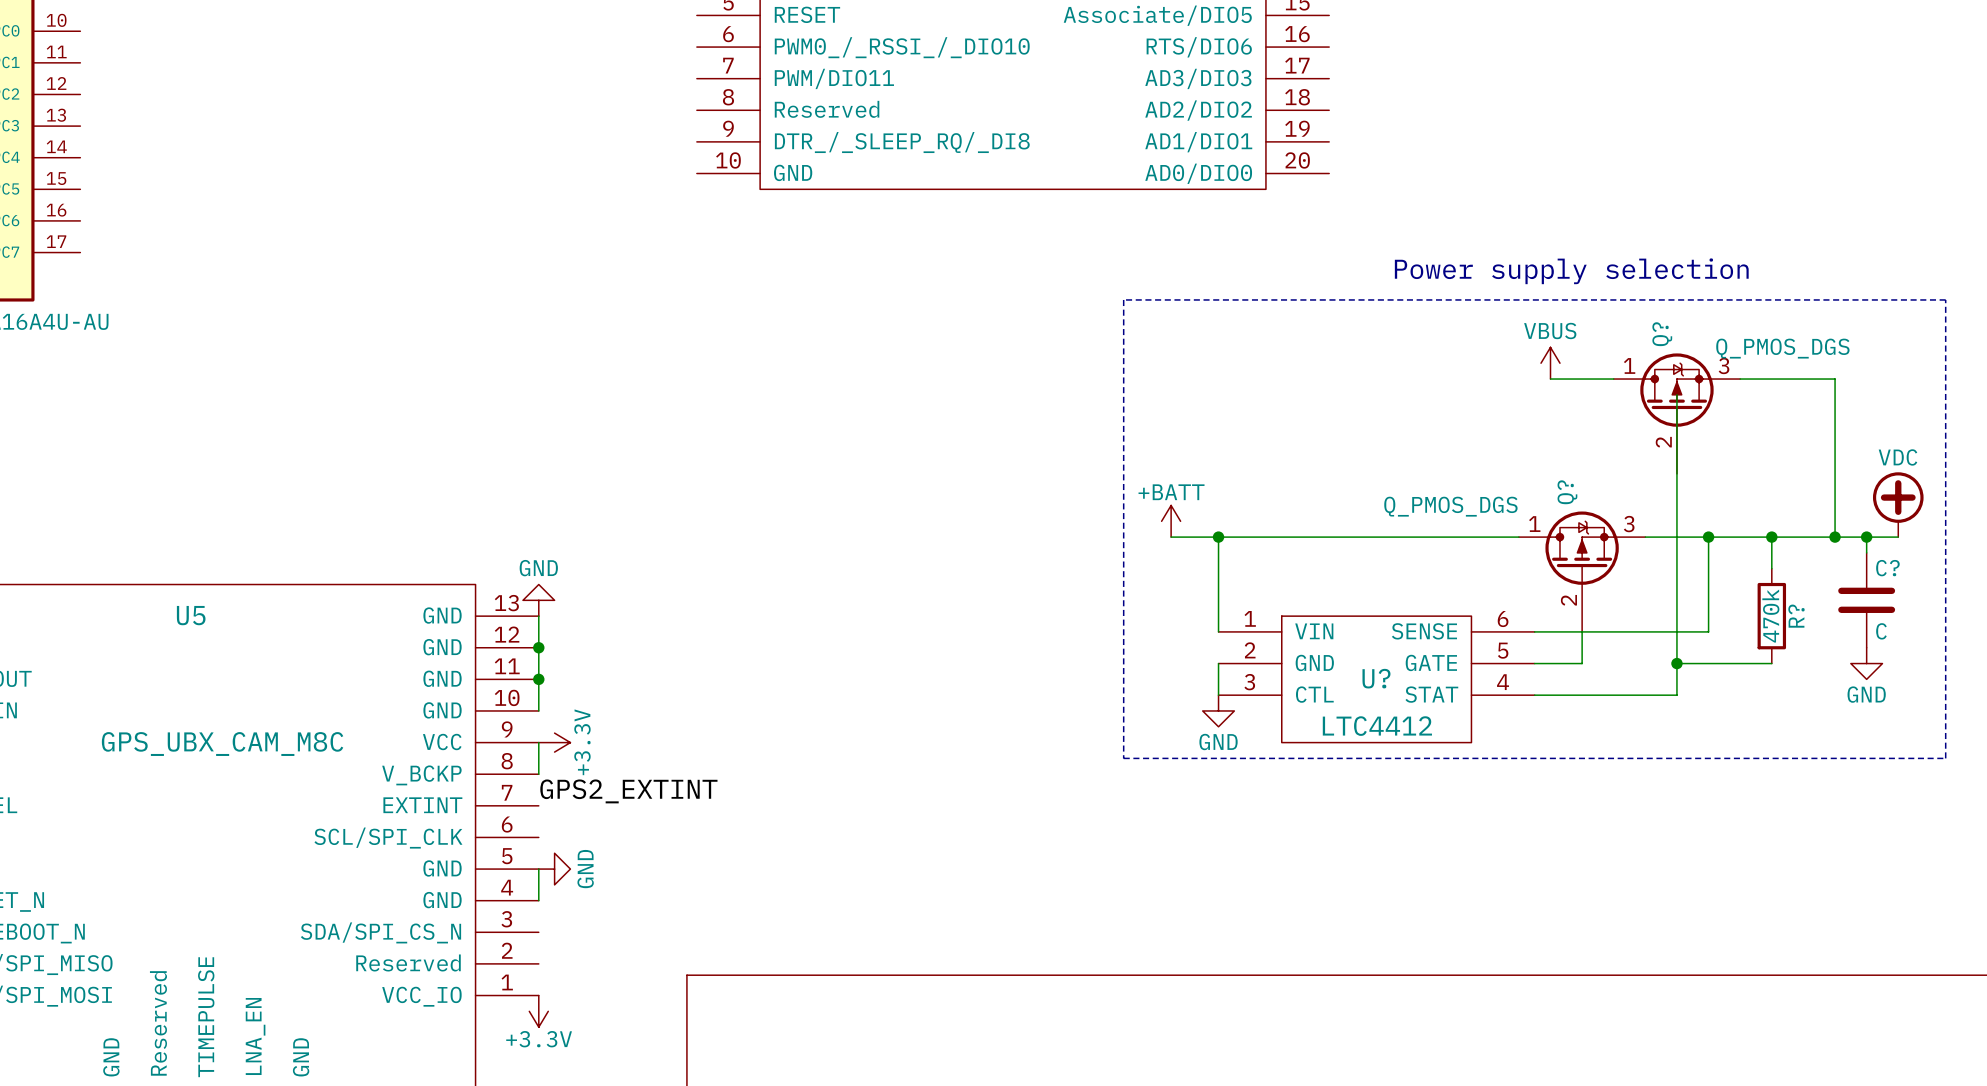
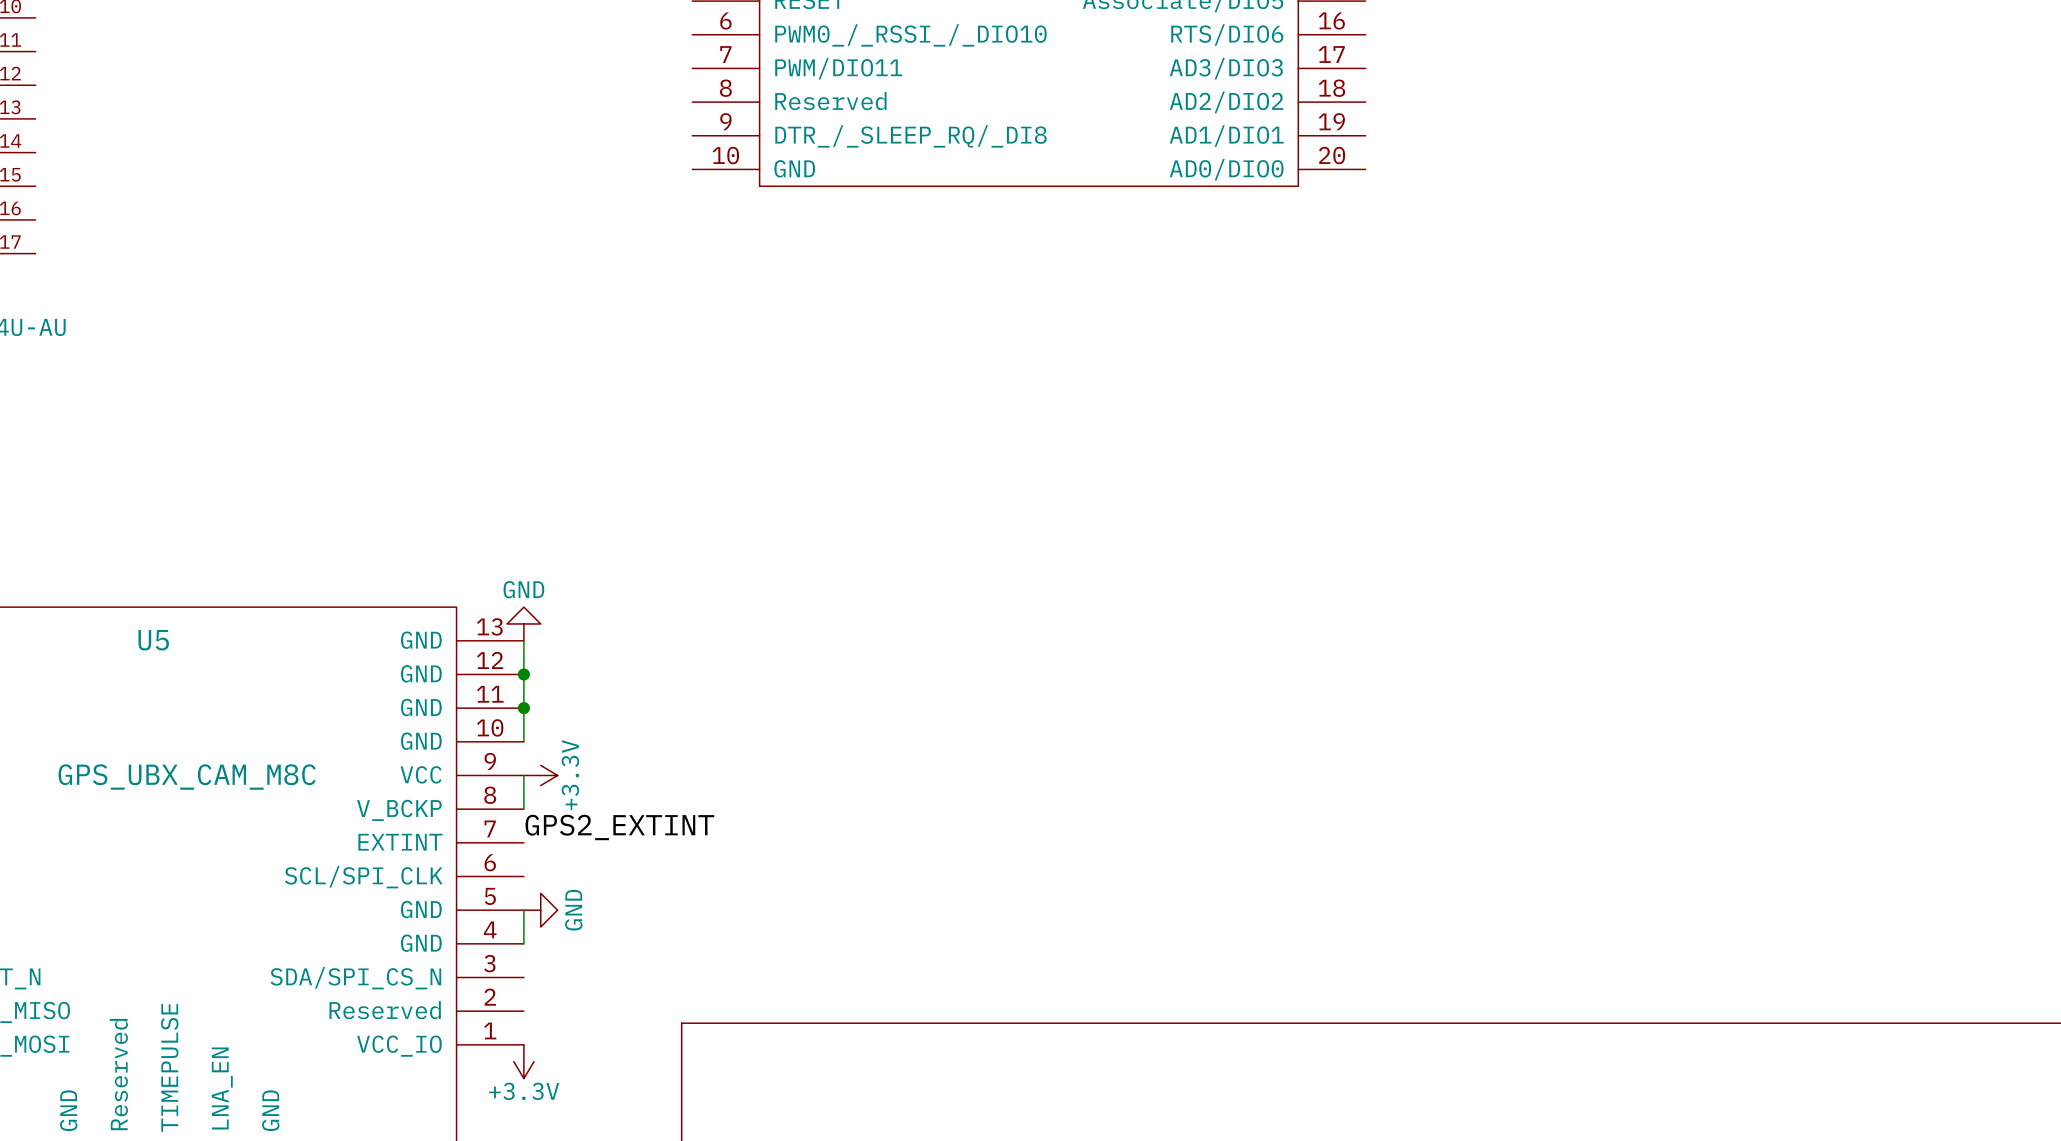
text: Power supply selection (1571, 271) -> none
line: (1123, 299) (1945, 299) (1945, 758) (1123, 758) (1123, 299) -> none
power symbol: VBUS (1550, 363) -> none
wire: (1550, 379) (1613, 379) -> none
wire: (1740, 379) (1835, 379) (1835, 537) -> none
wire: (1676, 394) (1676, 695) (1534, 695) -> none
Q?: Q_PMOS_DGS (1676, 413) -> none
power symbol: VDC (1898, 504) -> none
power symbol: +BATT (1171, 521) -> none
wire: (1171, 537) (1518, 537) -> none
wire: (1218, 537) (1218, 631) -> none
junction: (1218, 537) -> none
wire: (1645, 537) (1898, 537) -> none
wire: (1708, 537) (1708, 631) (1534, 631) -> none
junction: (1708, 537) -> none
wire: (1771, 537) (1771, 568) -> none
junction: (1771, 537) -> none
junction: (1835, 537) -> none
wire: (1866, 537) (1866, 552) -> none
junction: (1866, 537) -> none
Q?: Q_PMOS_DGS (1582, 571) -> none
C?: C (1866, 600) -> none
R?: 470k (1771, 616) -> none
wire: (1582, 631) (1582, 663) (1534, 663) -> none
wire: (1218, 663) (1218, 695) -> none
wire: (1676, 663) (1771, 663) -> none
junction: (1676, 663) -> none
power symbol: GND (1866, 663) -> none
U?: LTC4412 (1376, 679) -> none
power symbol: GND (1218, 710) -> none

